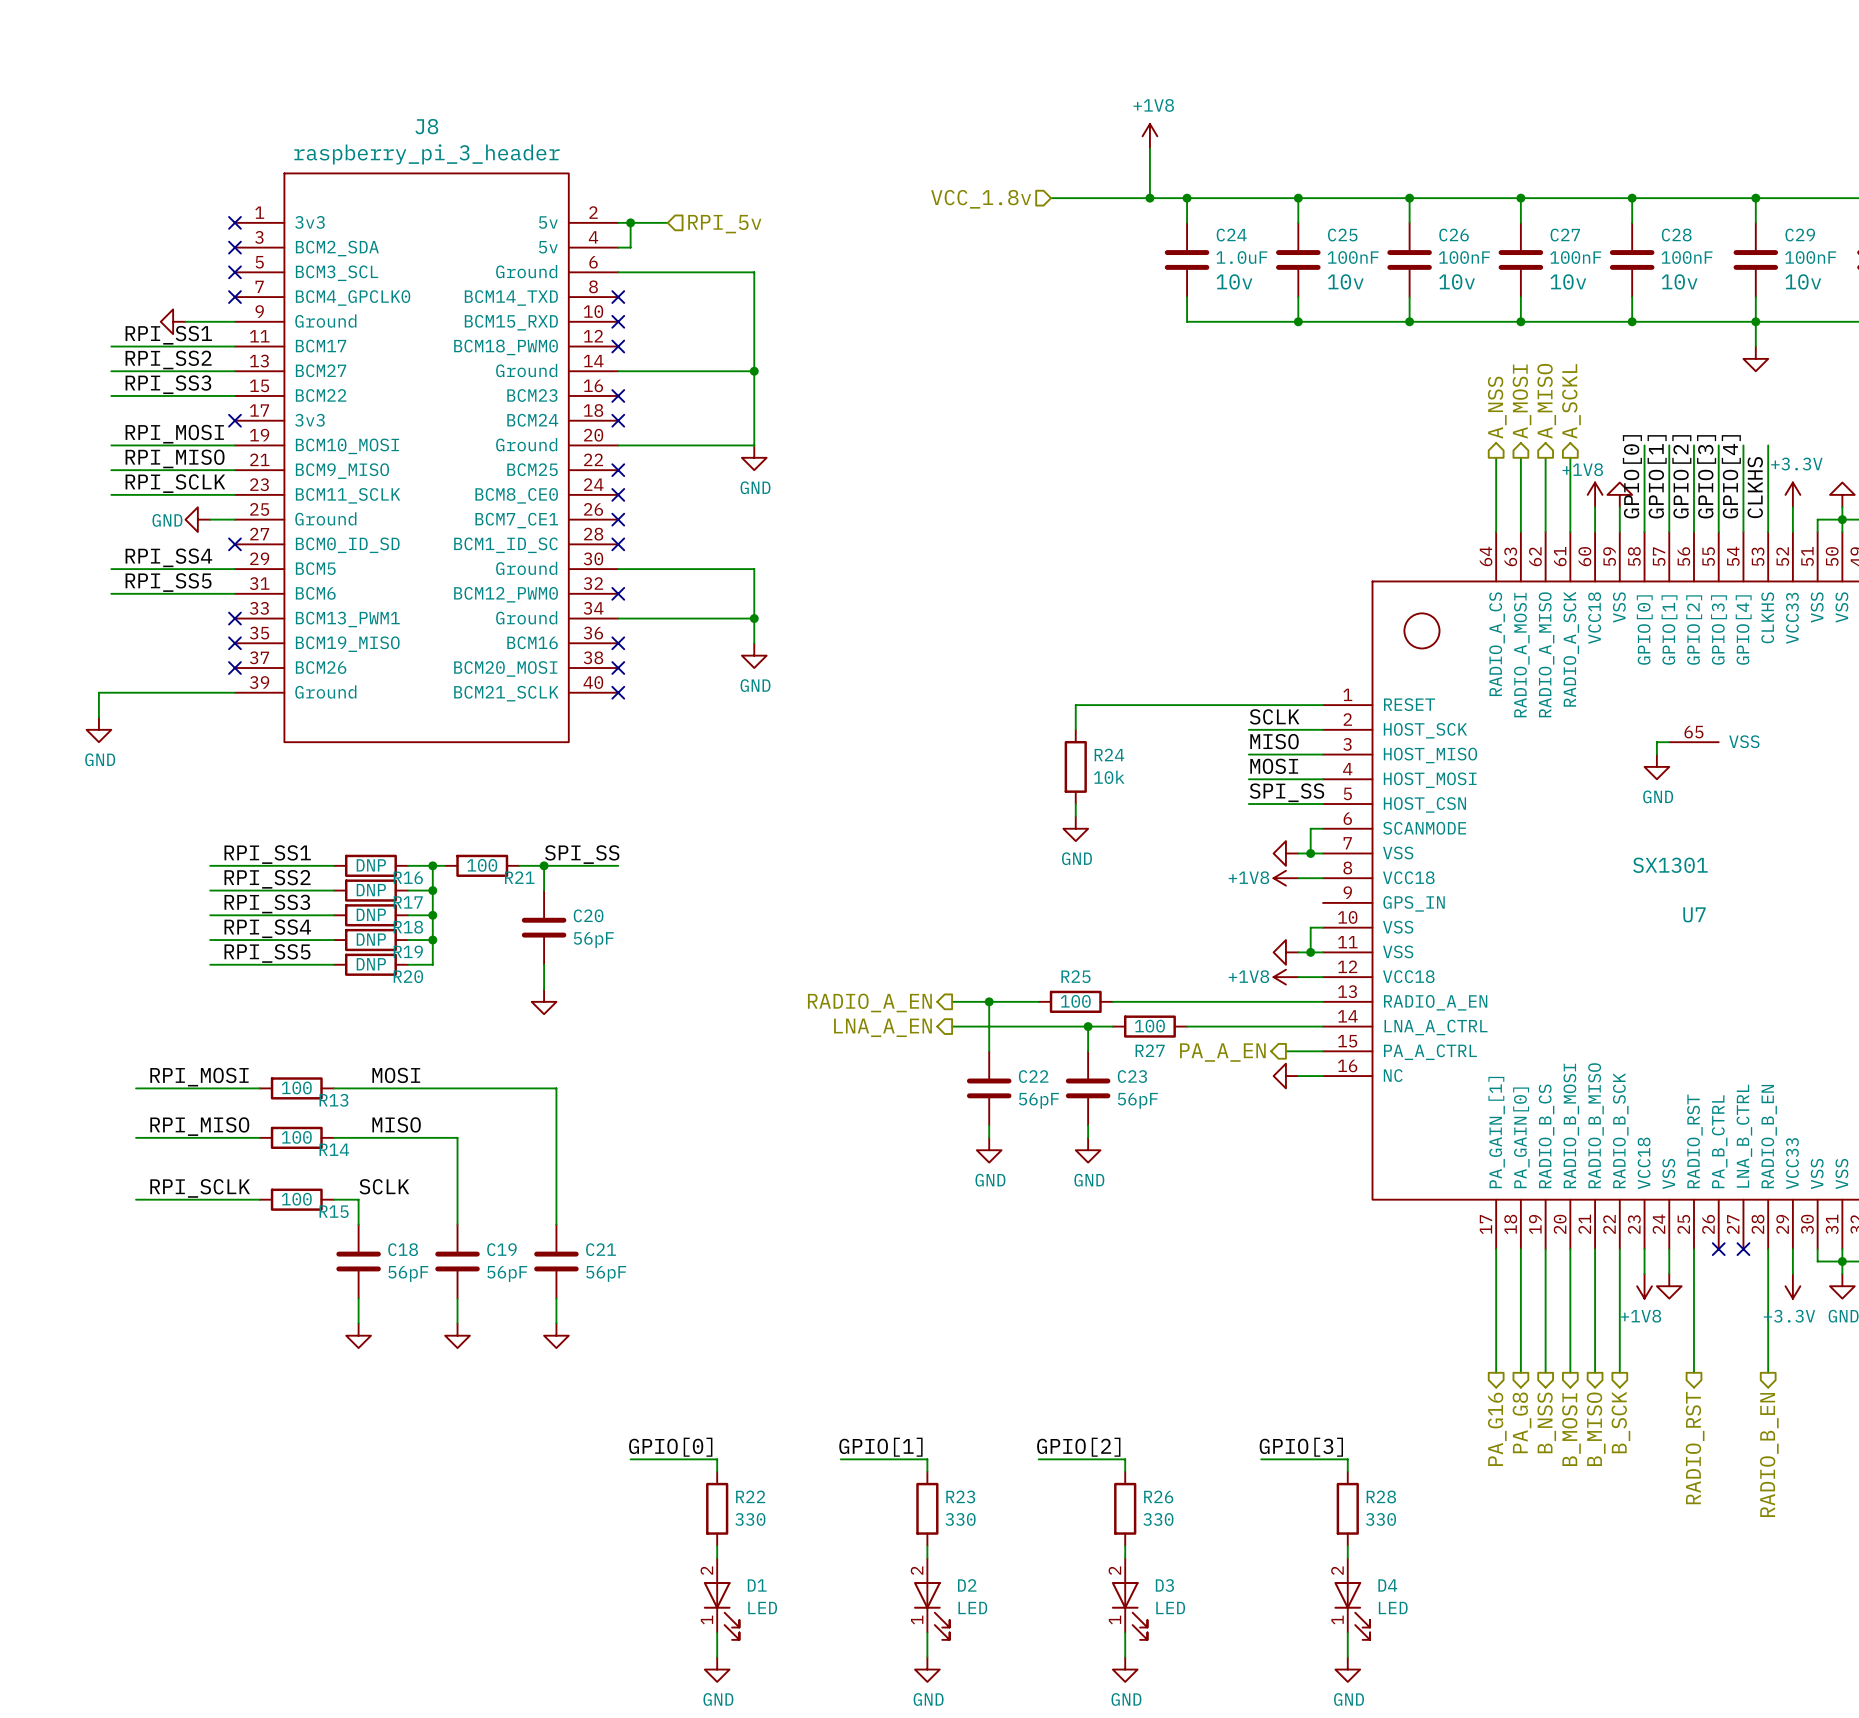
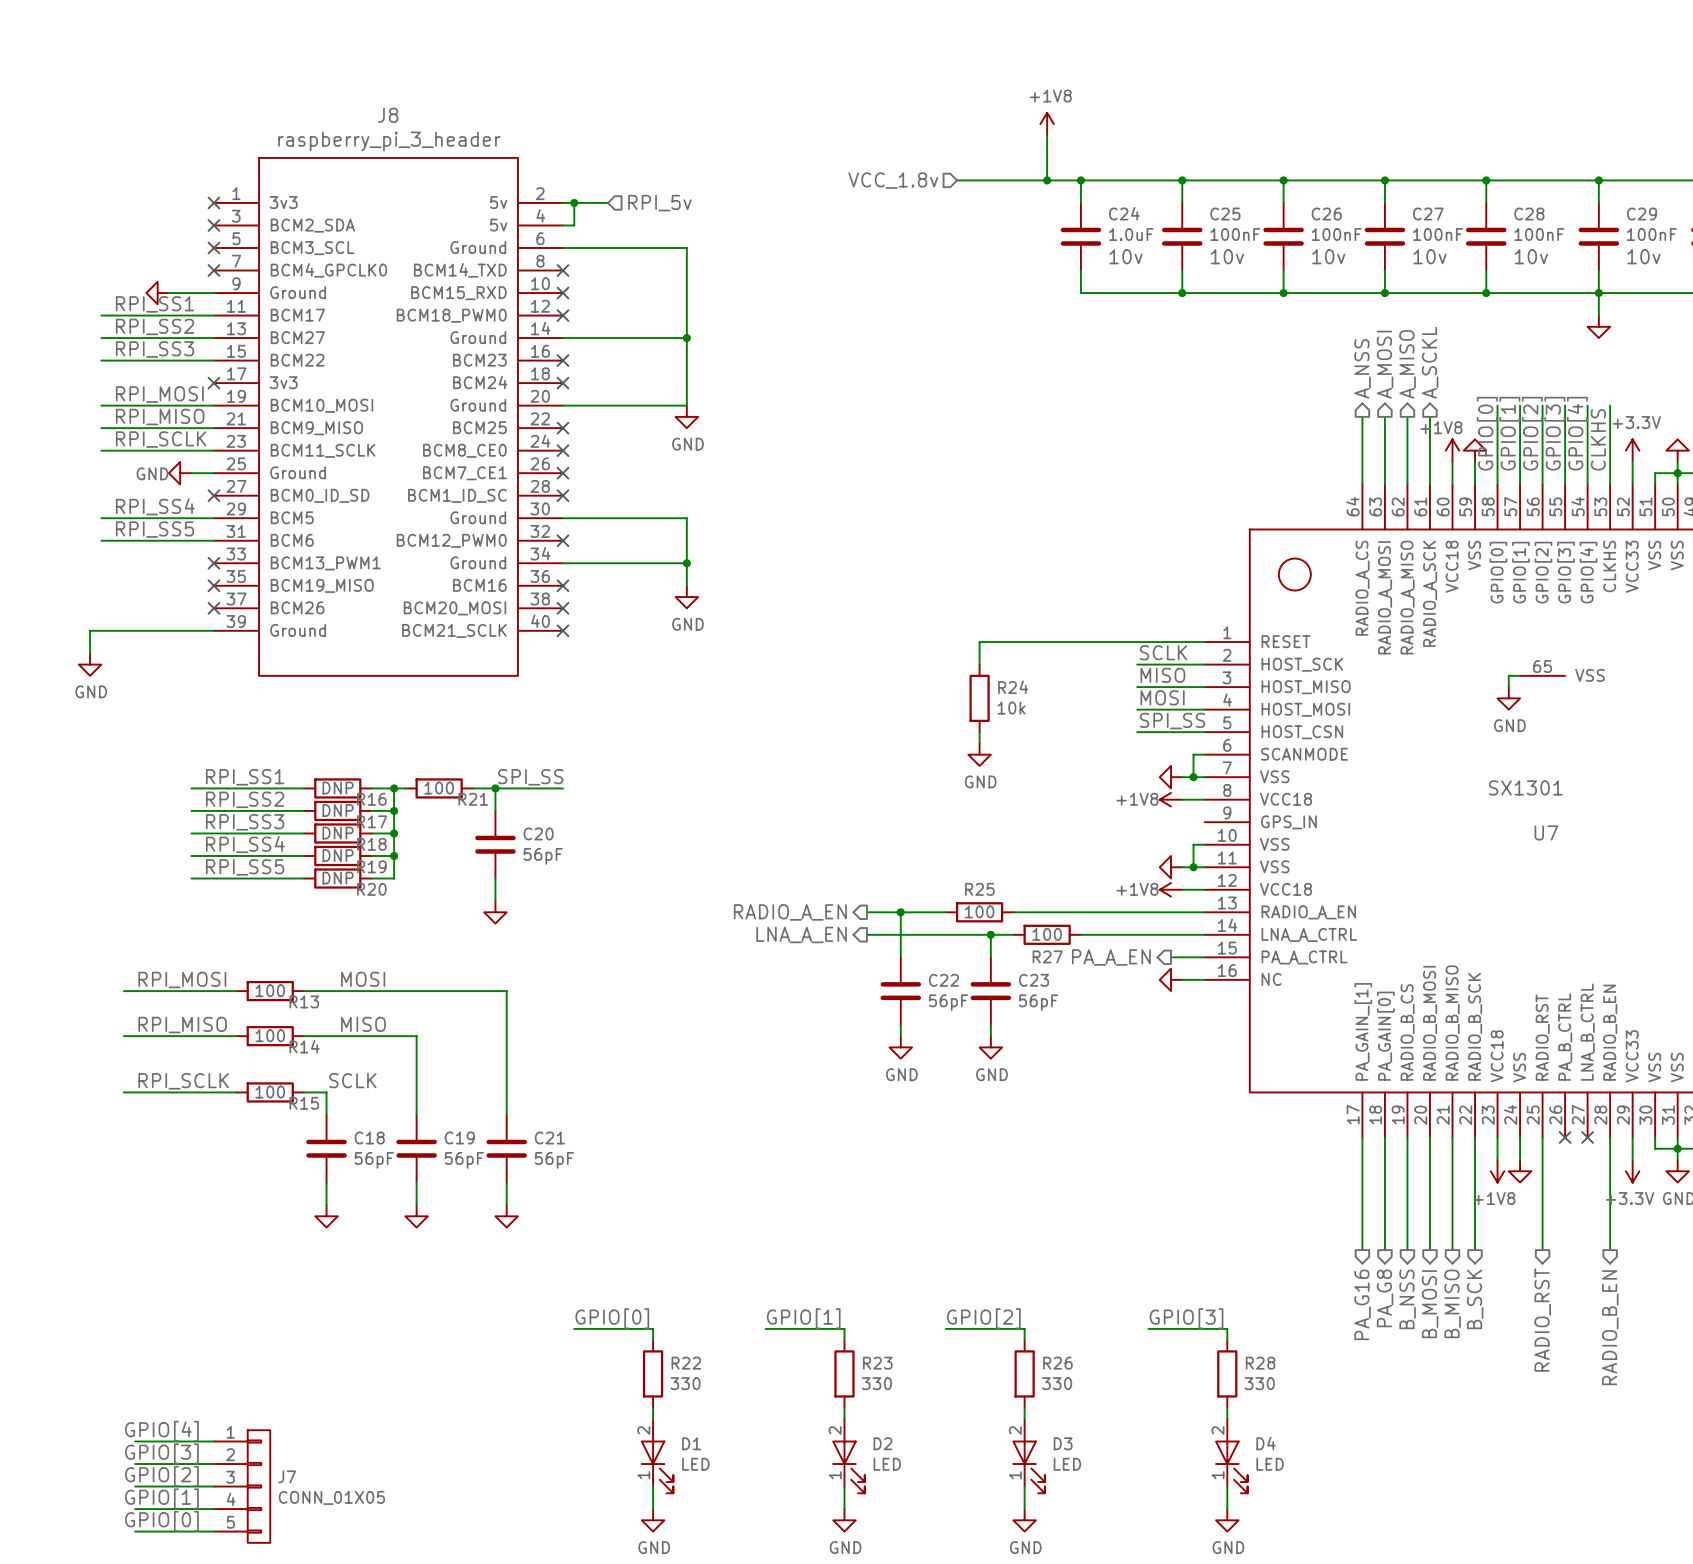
label: none -> GPIO[4] (161, 1431)
wire: none -> (135, 1441) (213, 1441)
label: none -> GPIO[3] (161, 1453)
wire: none -> (135, 1464) (213, 1464)
label: none -> GPIO[2] (161, 1476)
wire: none -> (135, 1486) (213, 1486)
J7: none -> CONN_01X05 (242, 1486)
label: none -> GPIO[1] (161, 1498)
wire: none -> (135, 1509) (213, 1509)
label: none -> GPIO[0] (161, 1521)
wire: none -> (135, 1531) (213, 1531)

